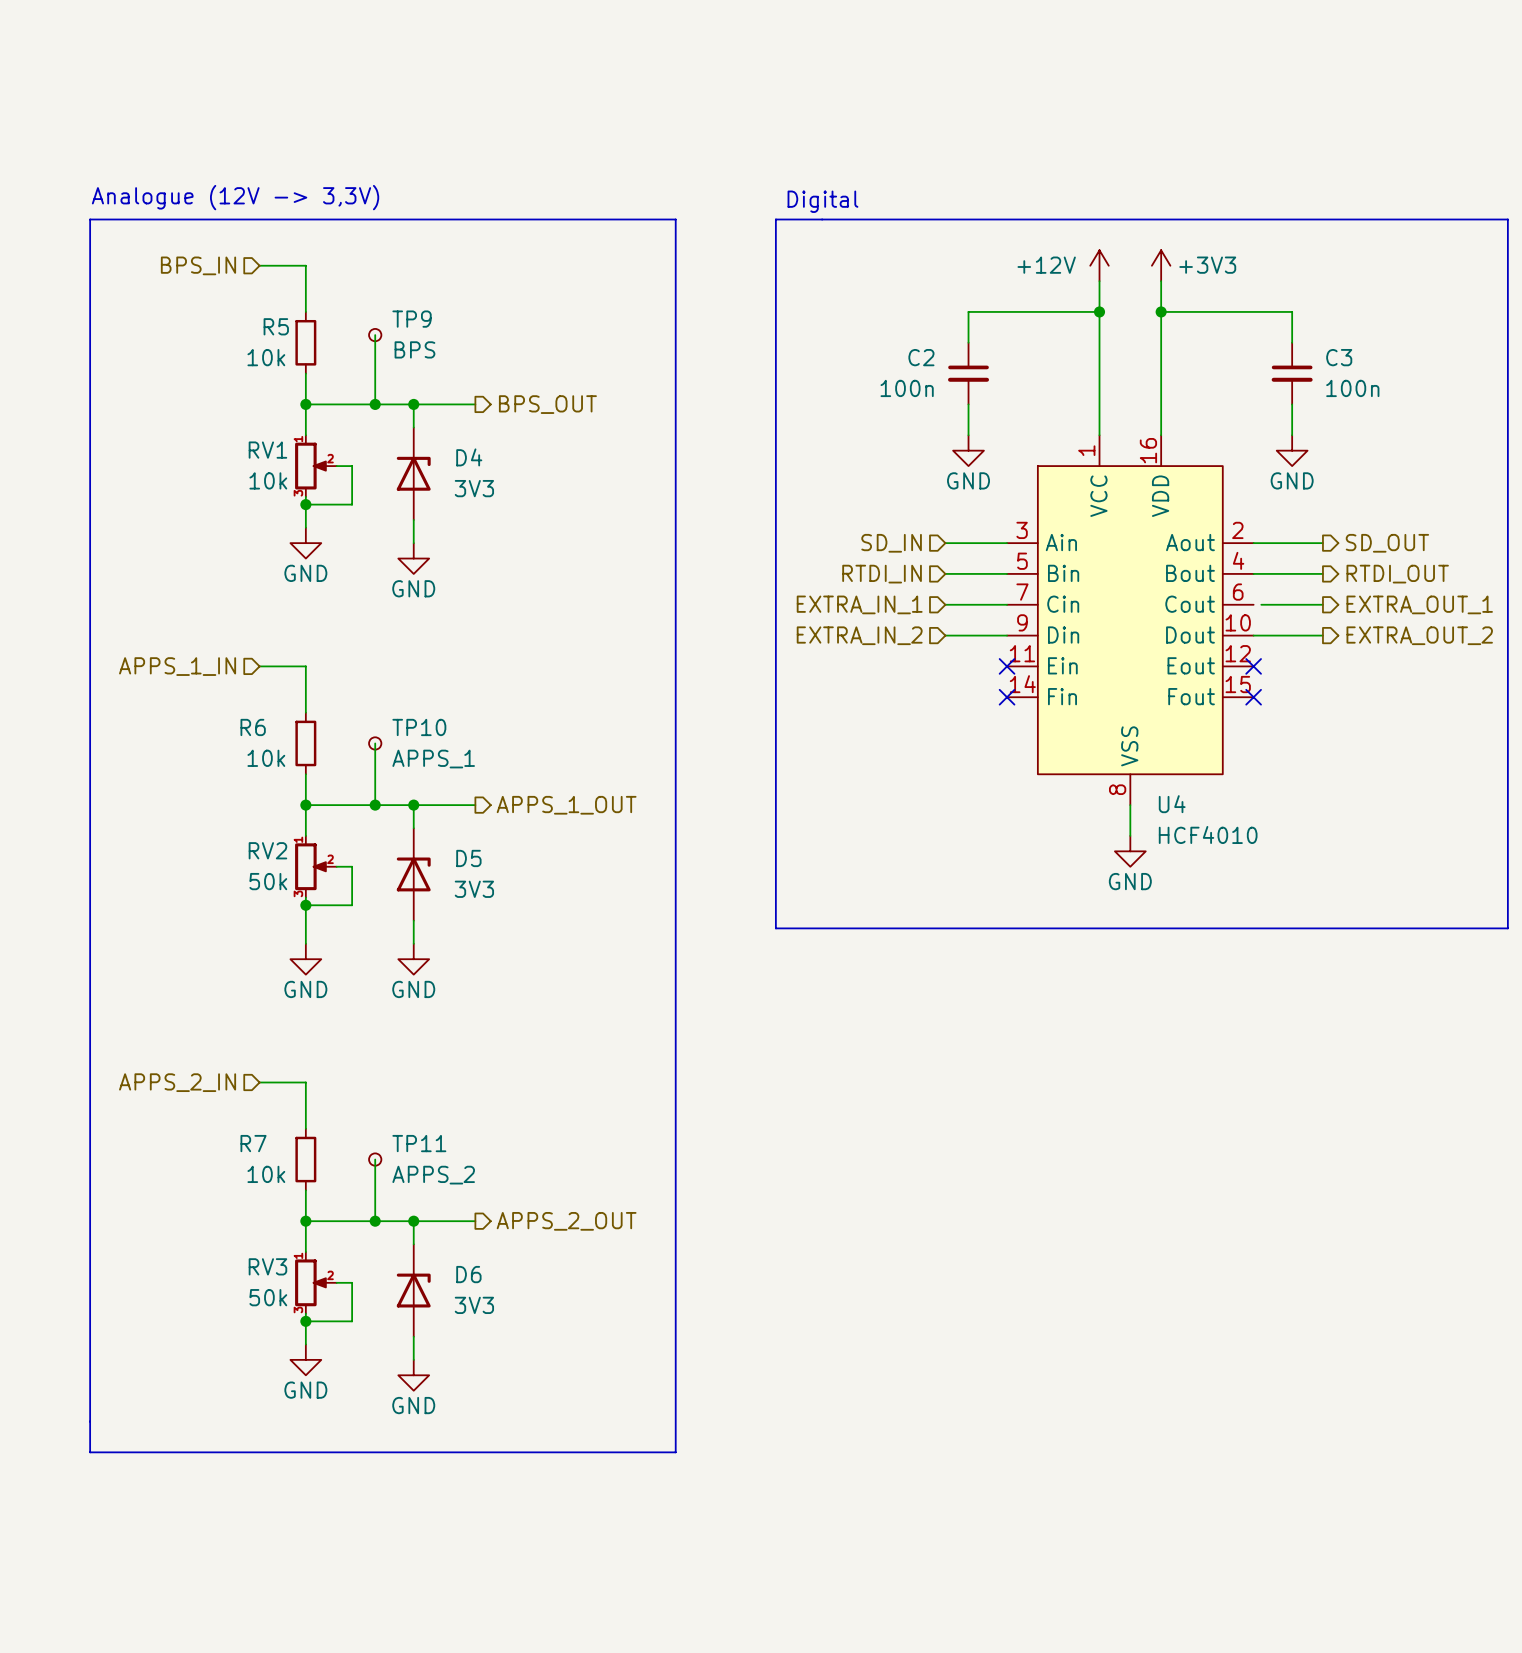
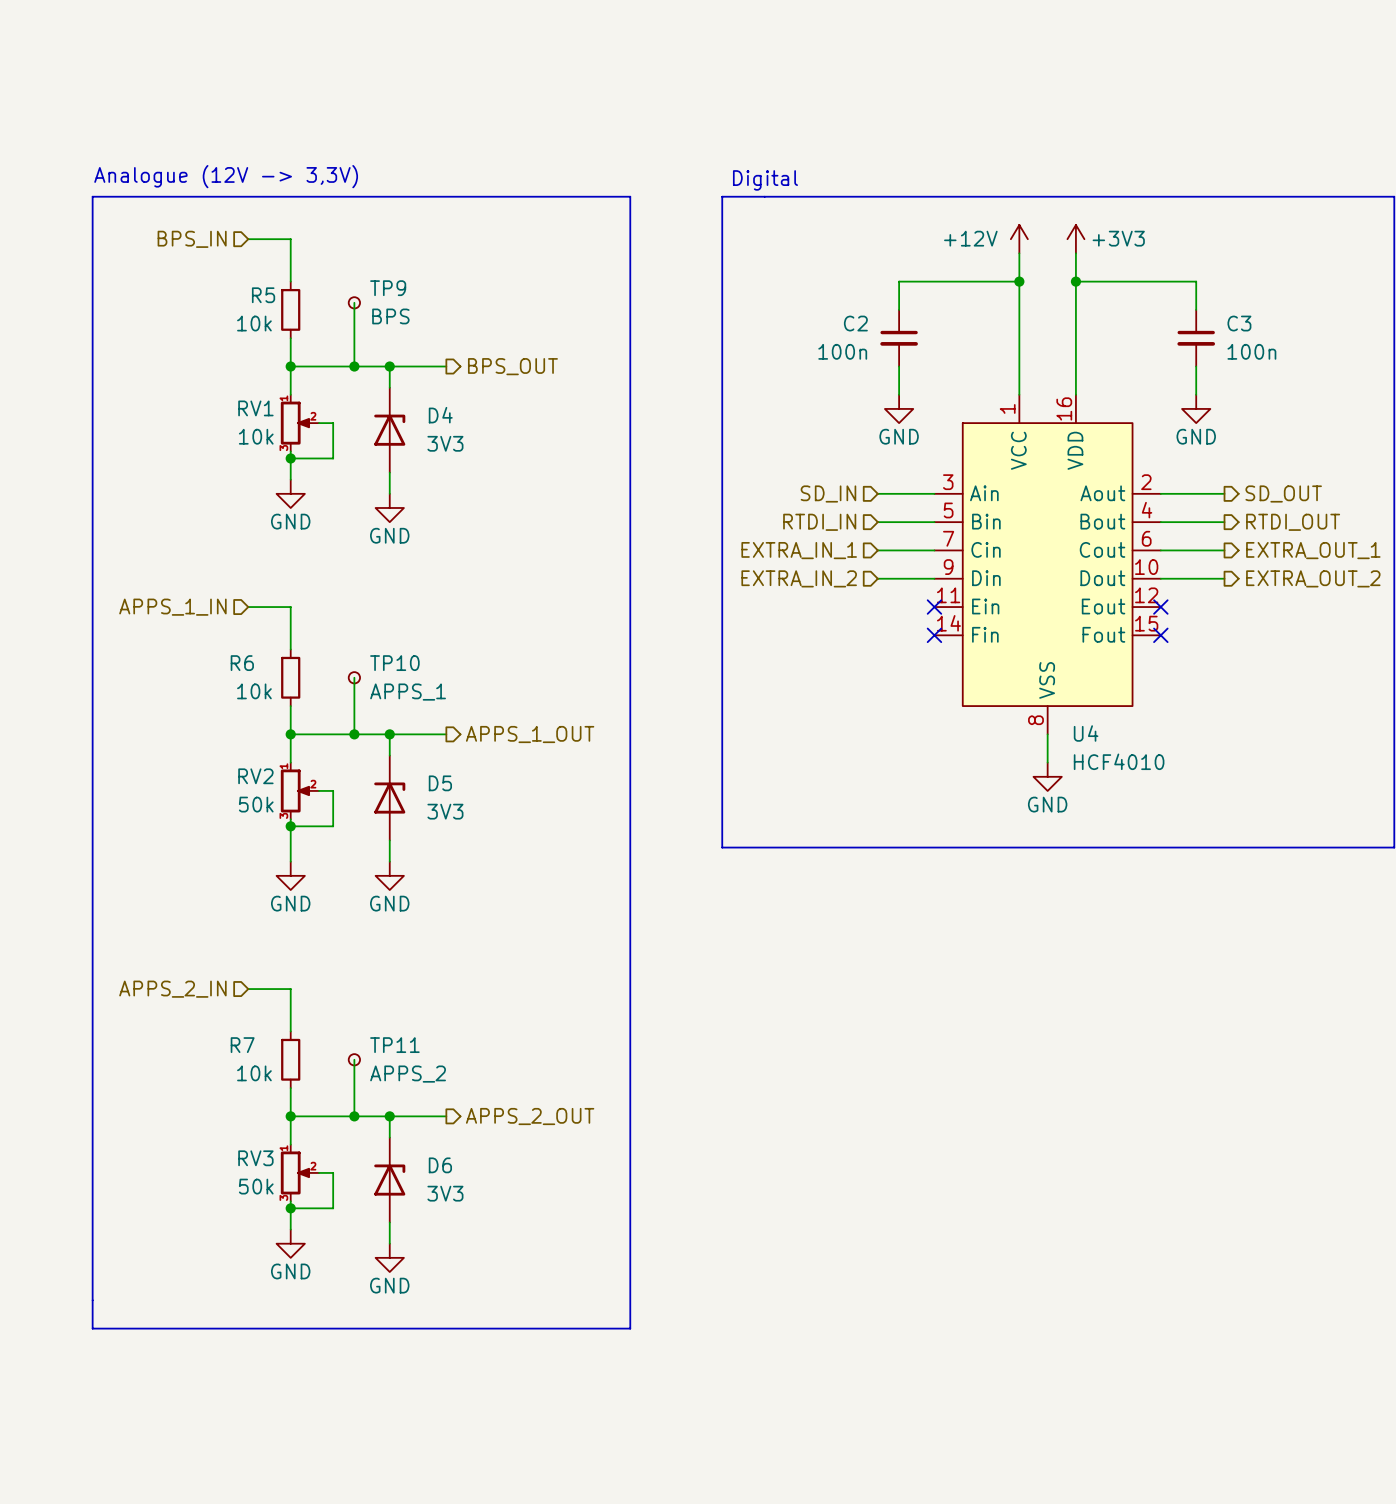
wire: none -> (1160, 550) (1167, 550)

